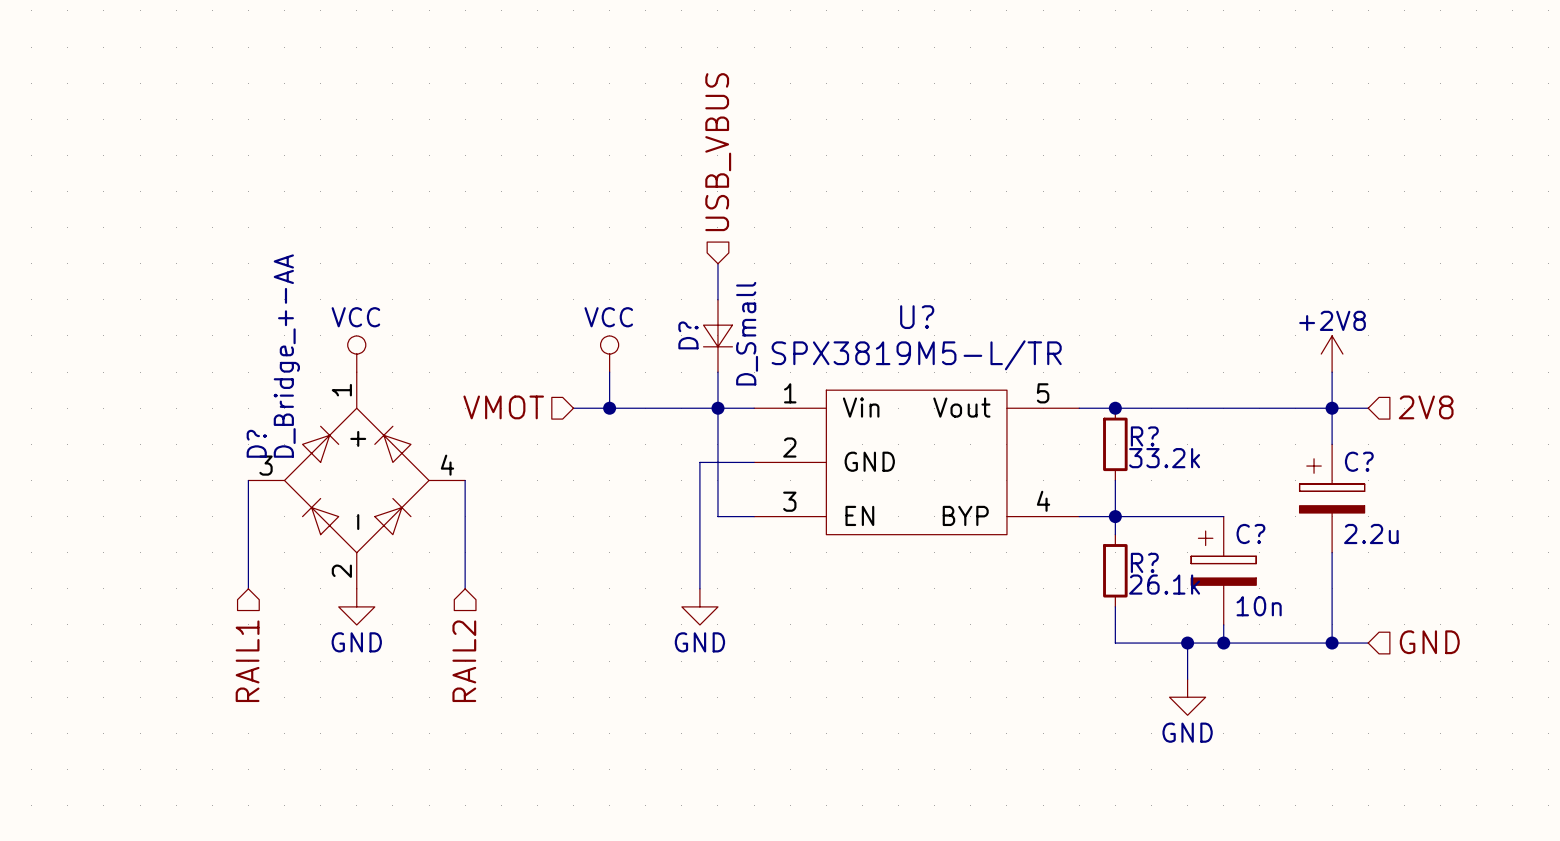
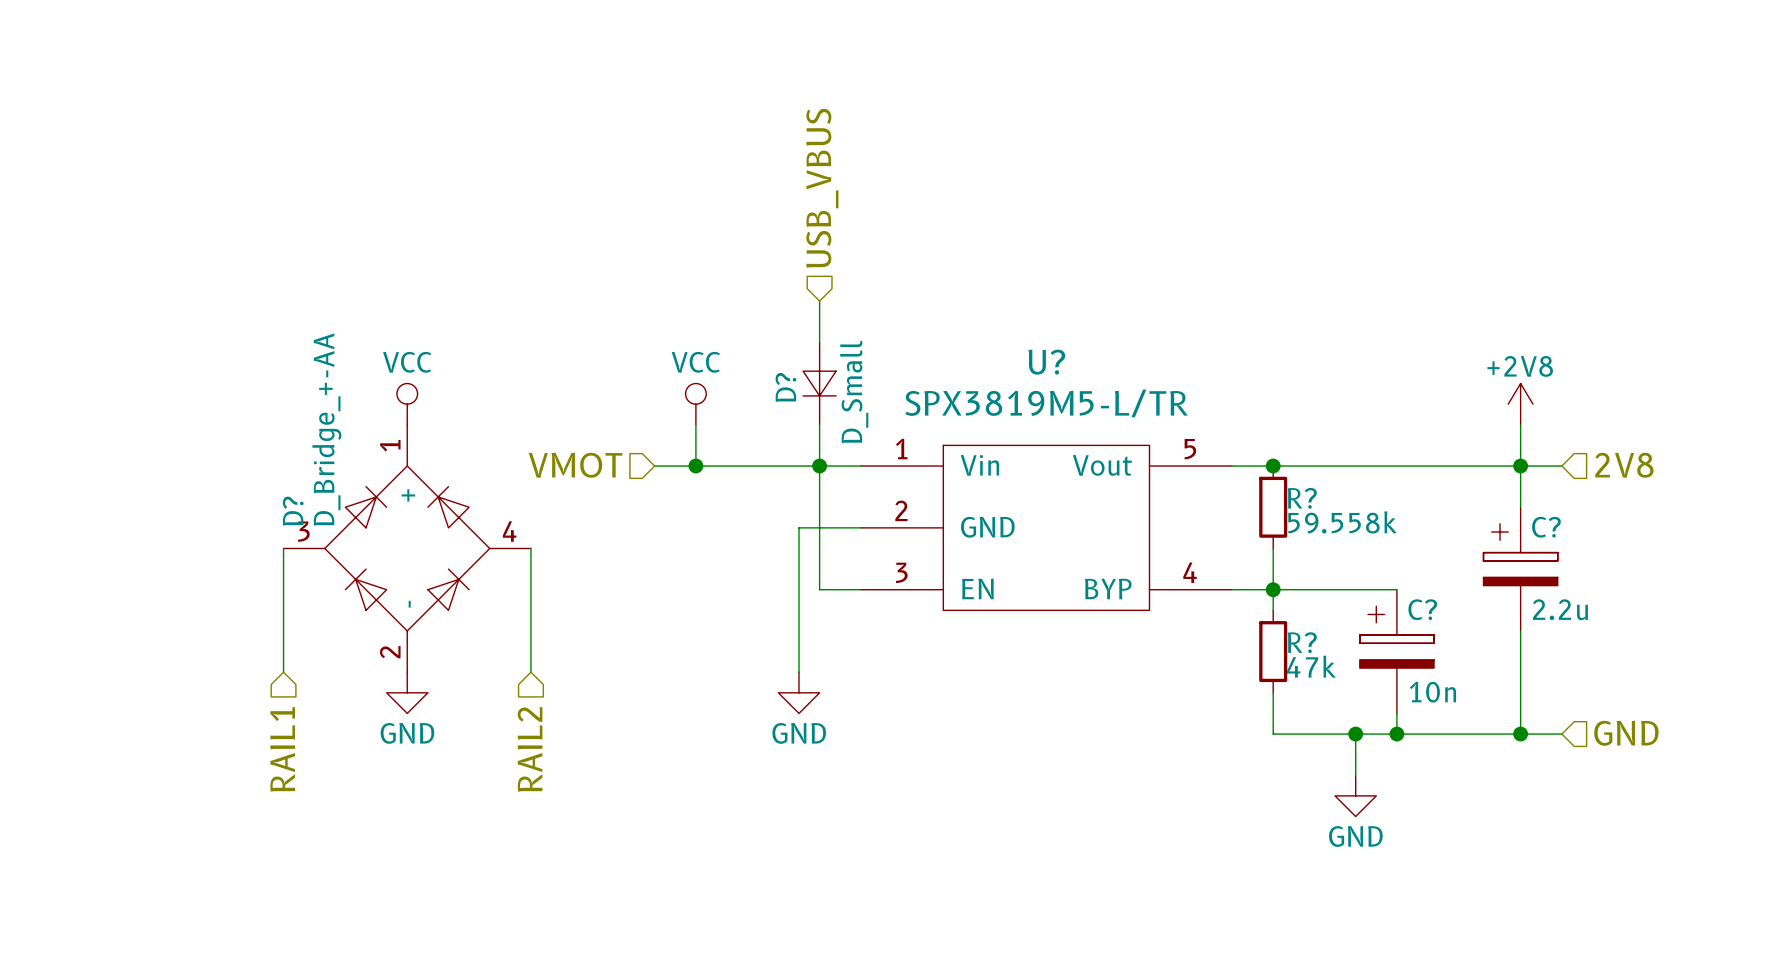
R? value: 33.2k (1164, 458) -> 59.558k (1342, 522)
R? value: 26.1k (1164, 584) -> 47k (1311, 666)

